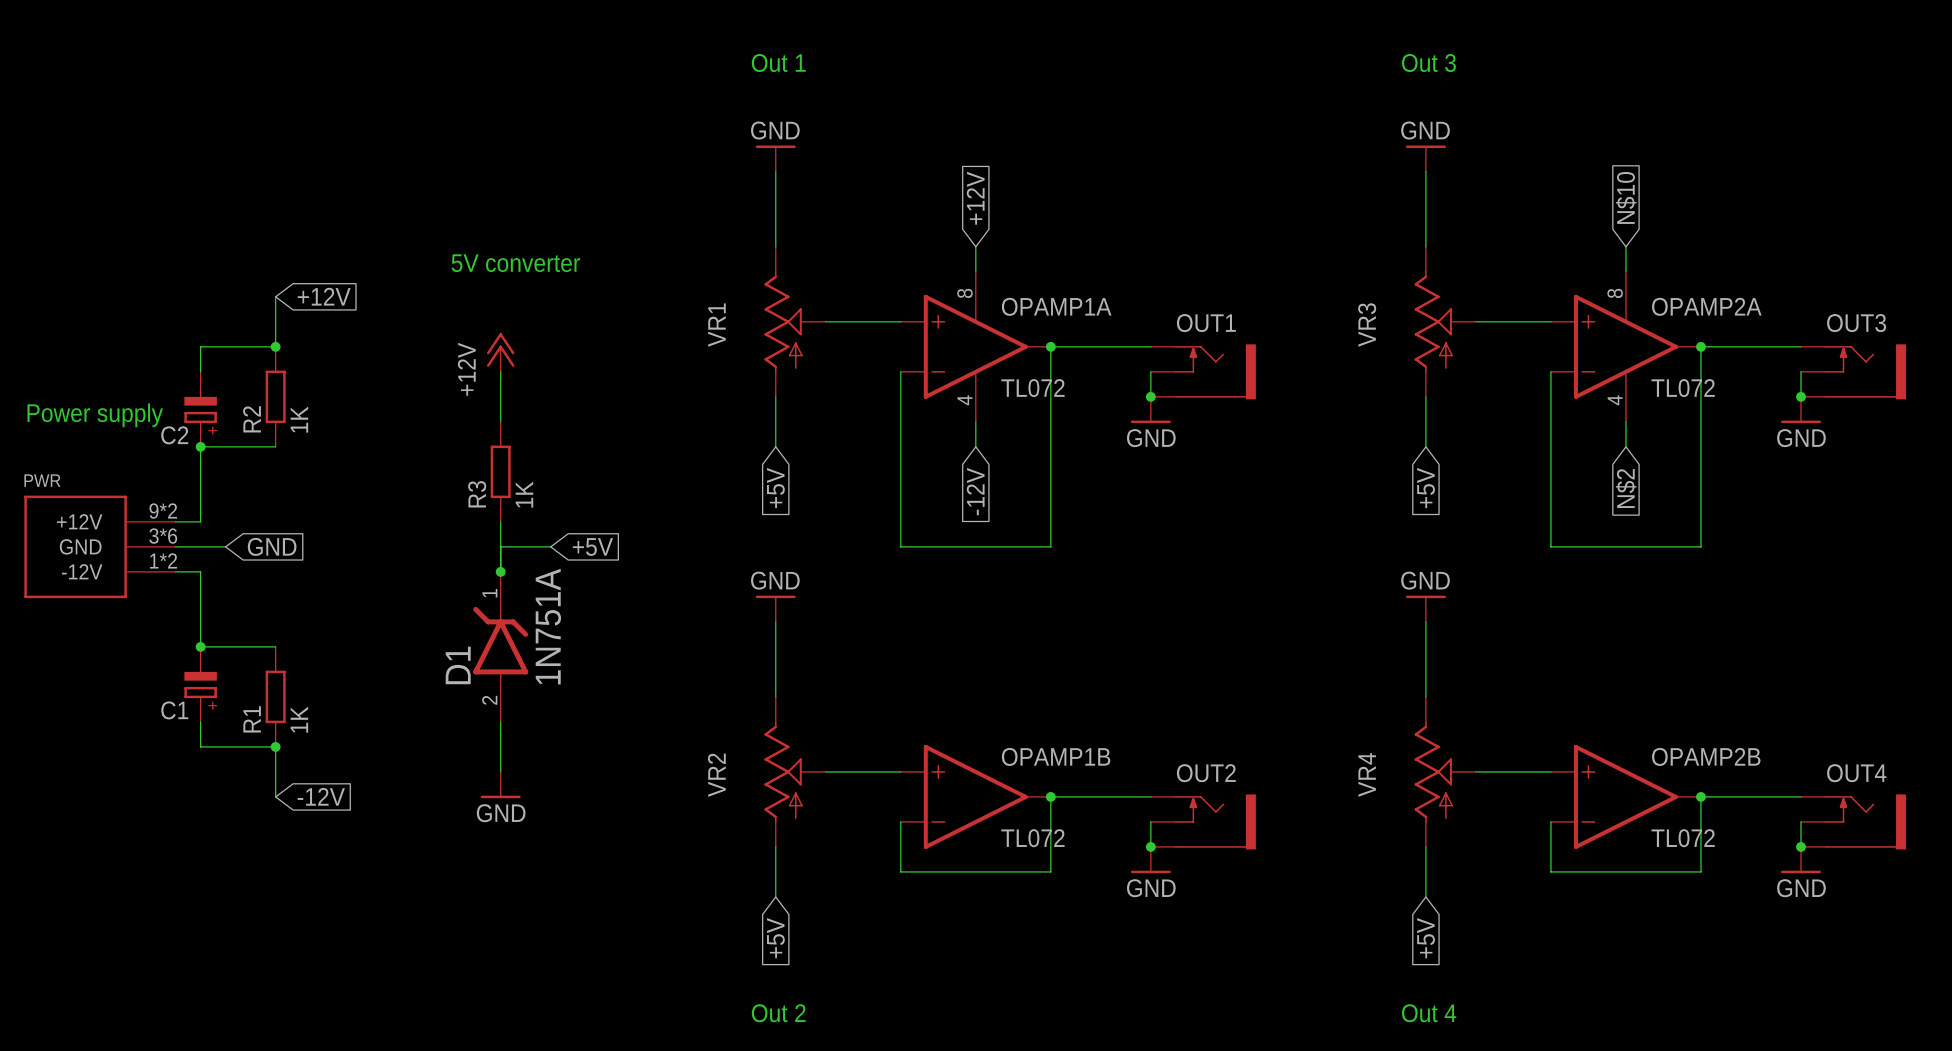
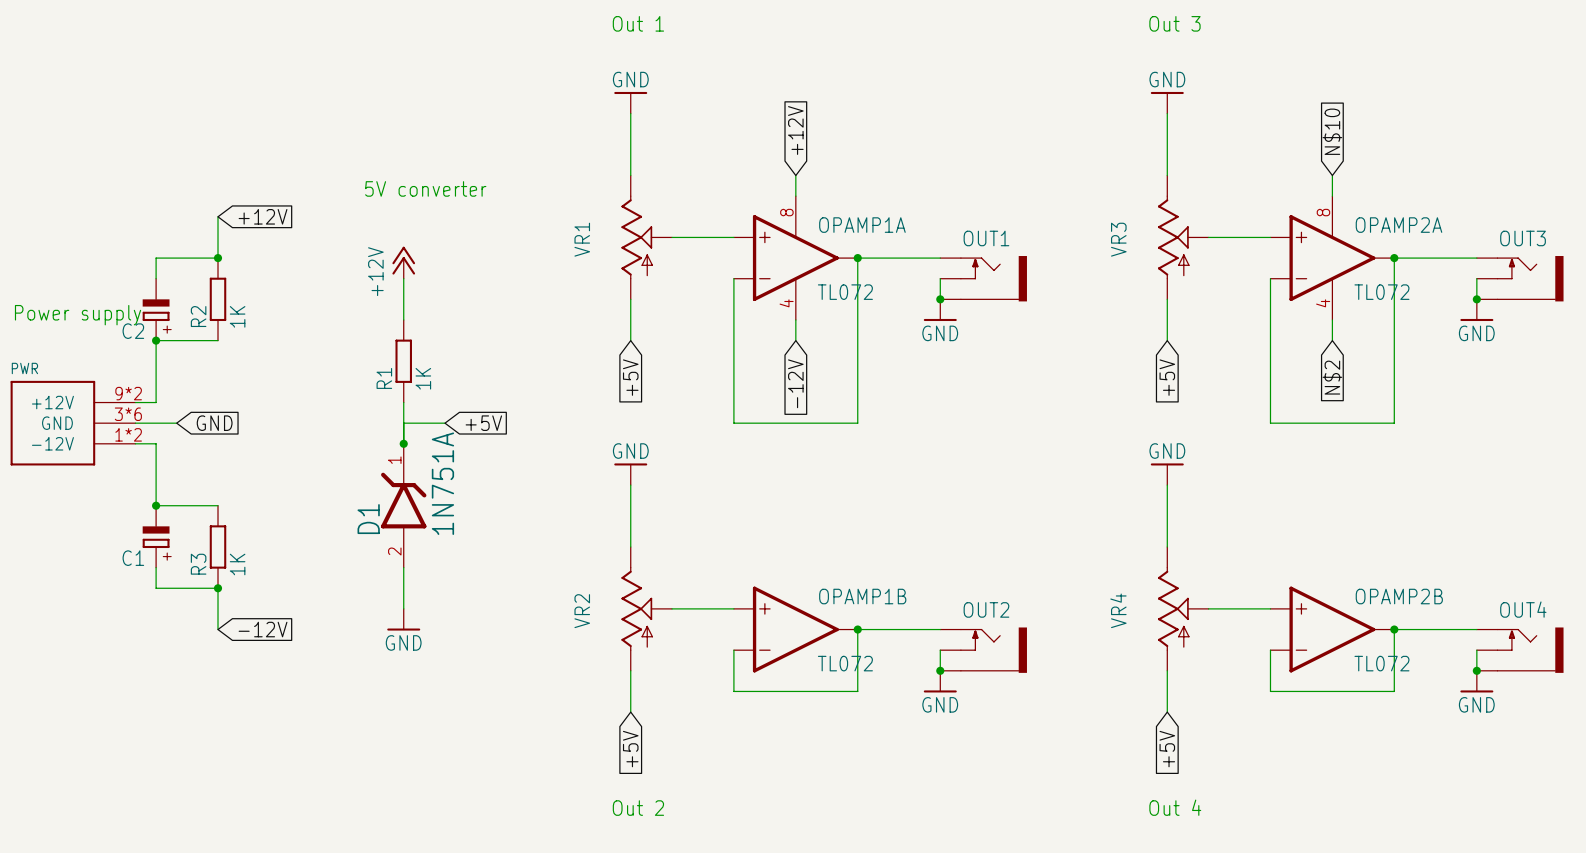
R3 name: R3 (477, 494) -> R1 (384, 378)
R1 name: R1 (252, 719) -> R3 (198, 564)

